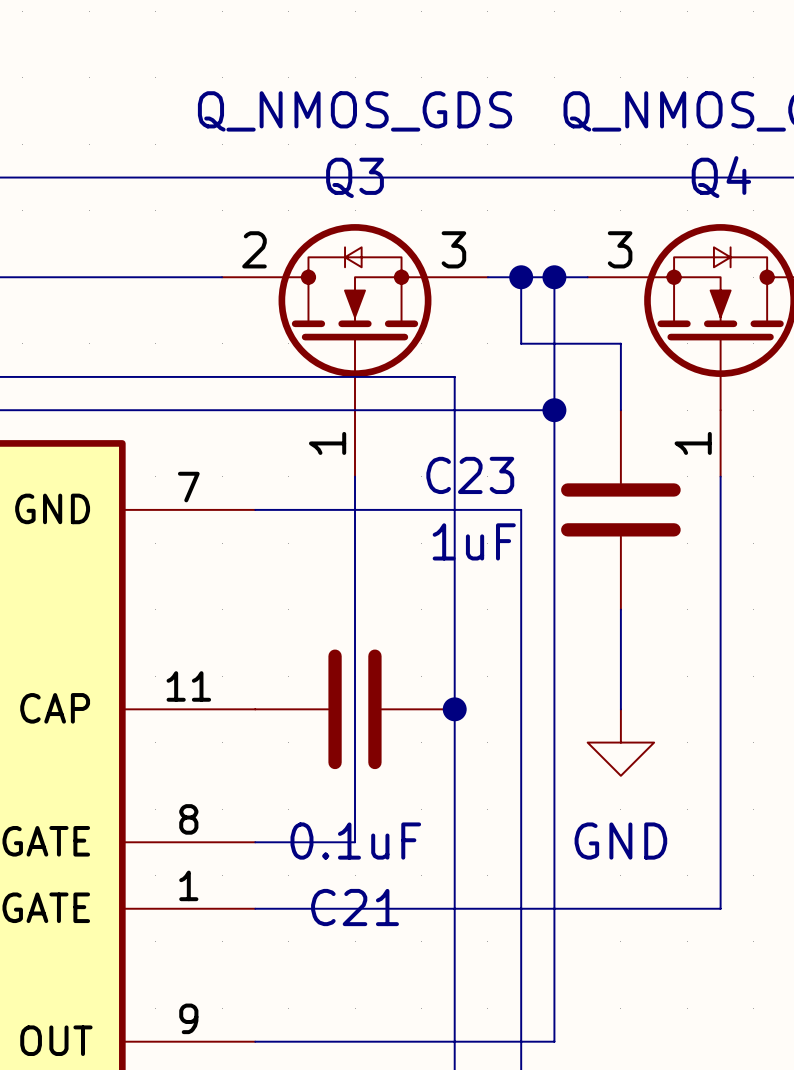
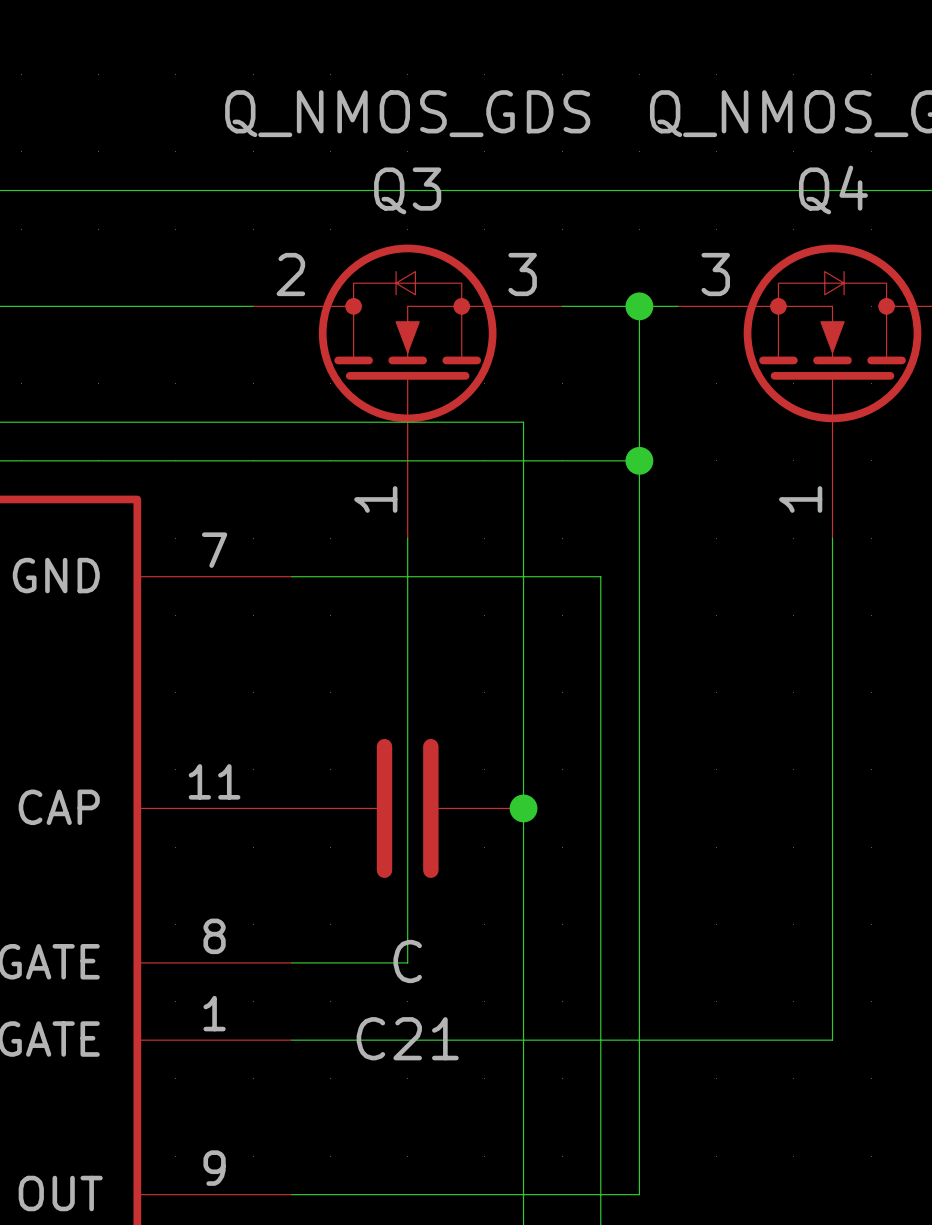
wire: (521, 277) (521, 343) (620, 343) (620, 410) -> none
junction: (521, 277) -> none
C23: 1uF (620, 509) -> none
wire: (620, 609) (620, 709) -> none
power symbol: GND (620, 742) -> none
C21 value: 0.1uF (355, 841) -> C (407, 961)

